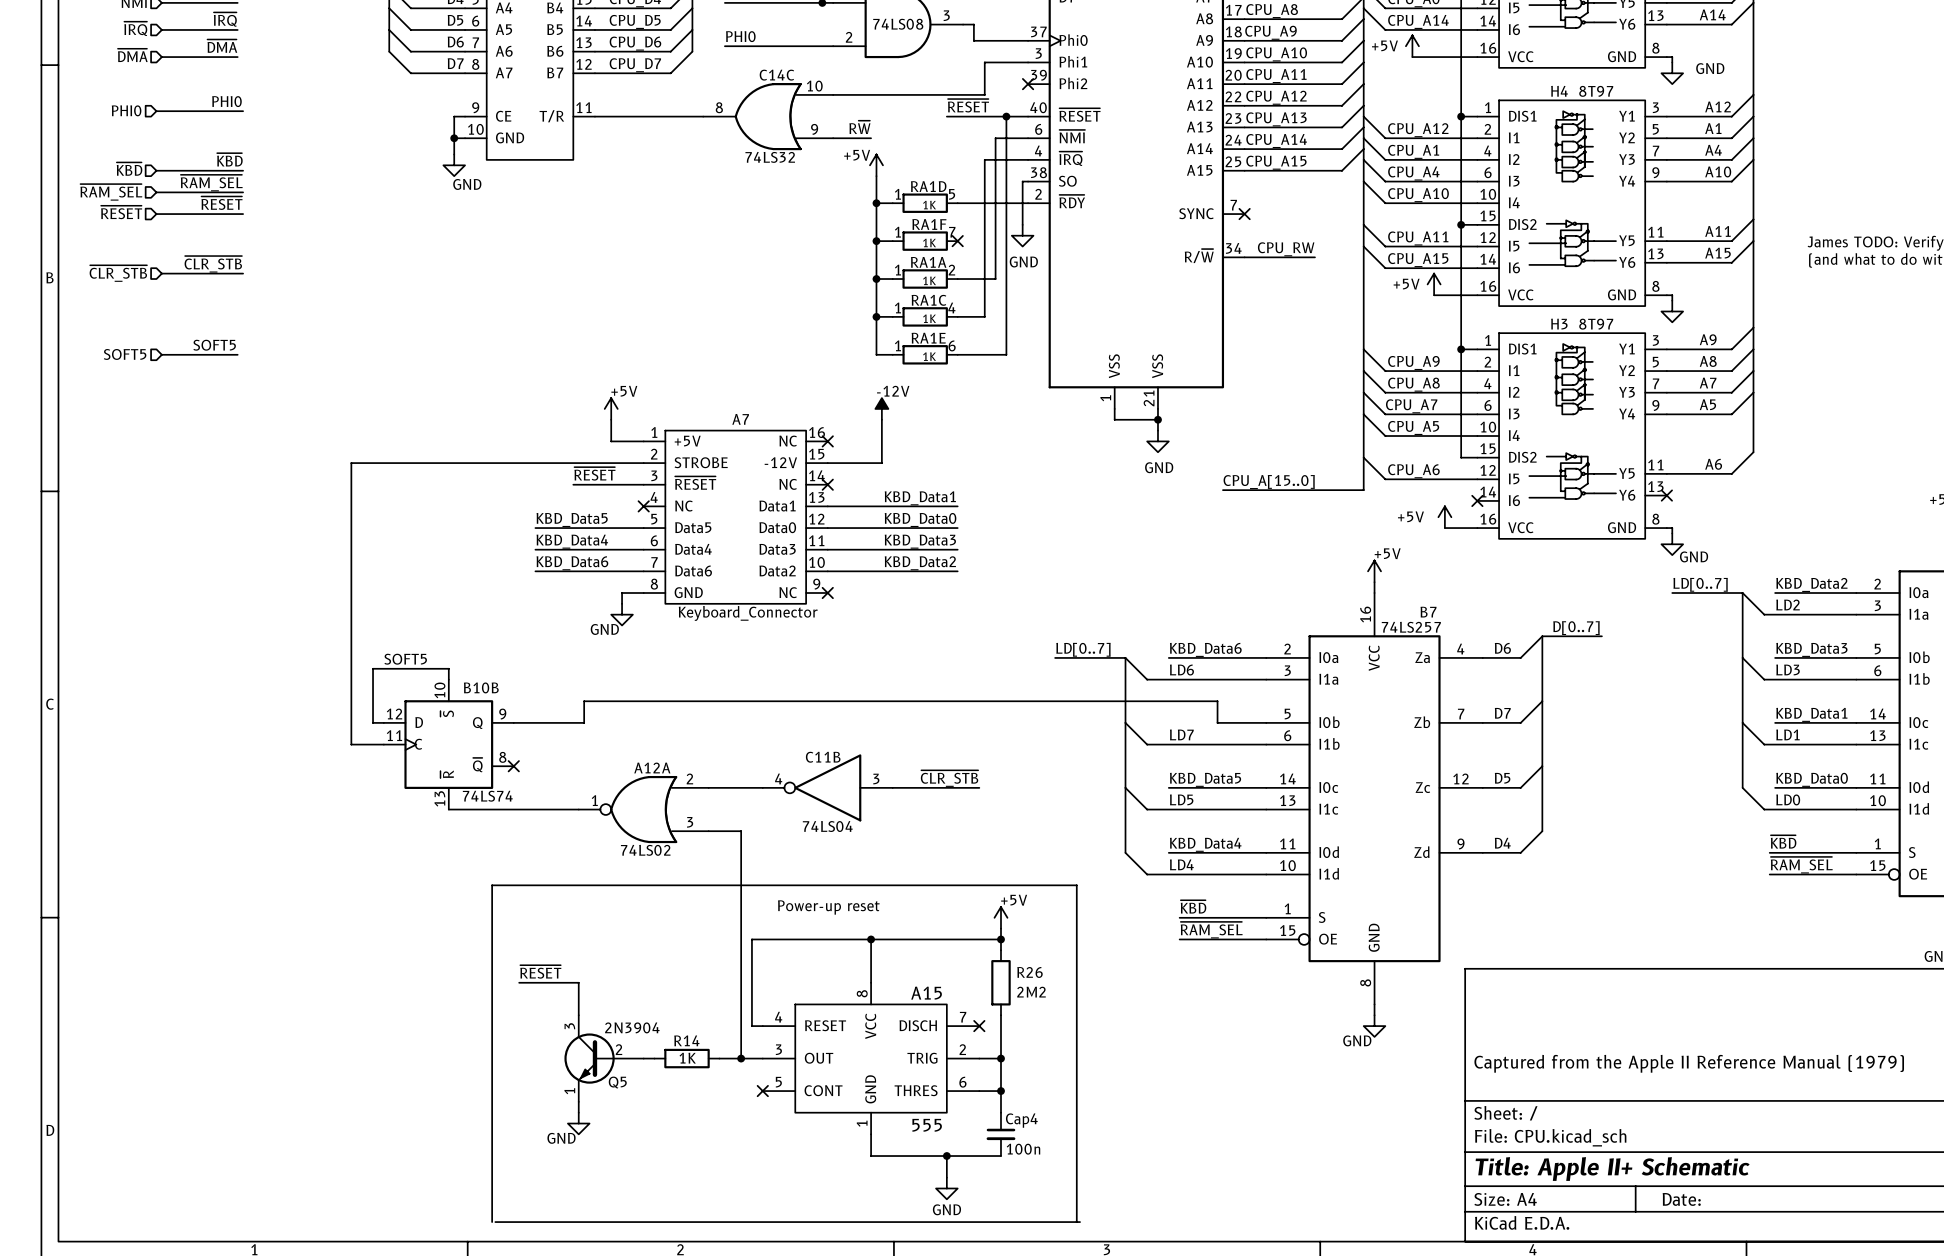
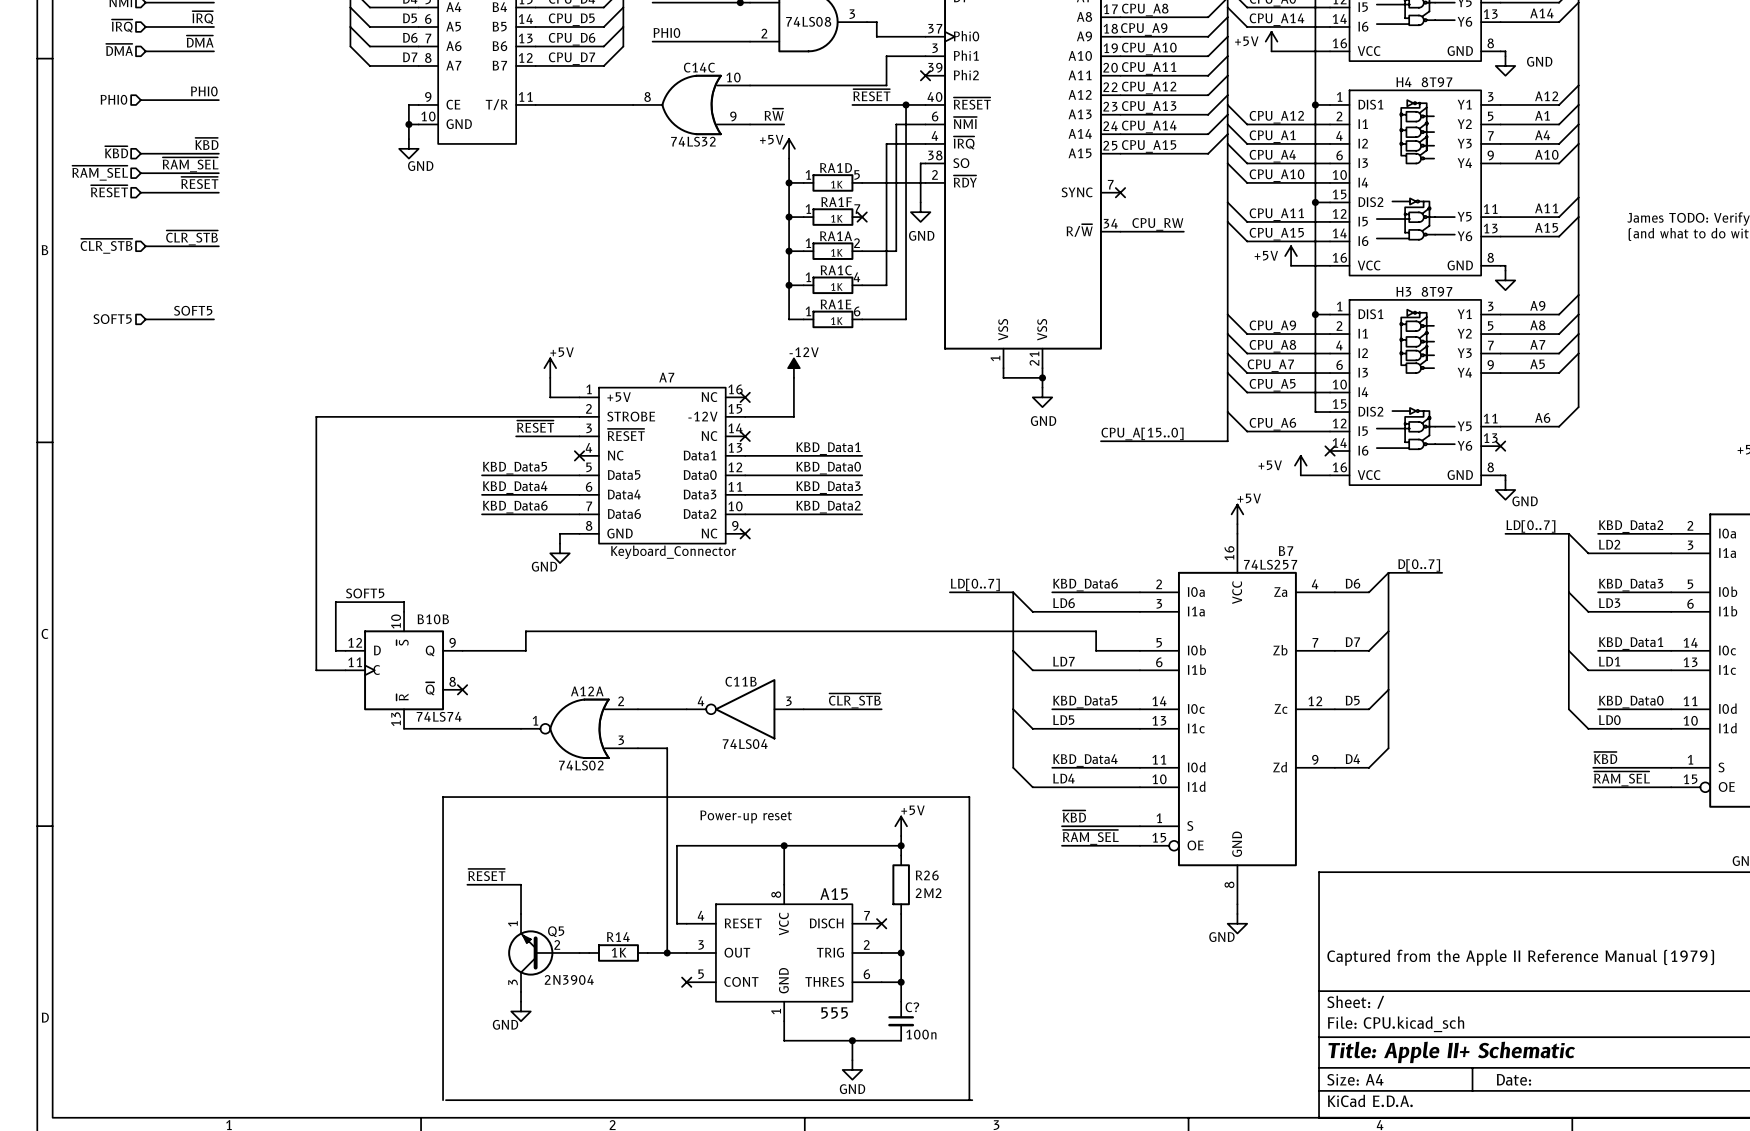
Q5 flip: as is (589, 1058) -> up-down (530, 952)
Cap4 name: Cap4 (1021, 1120) -> C? (912, 1007)

